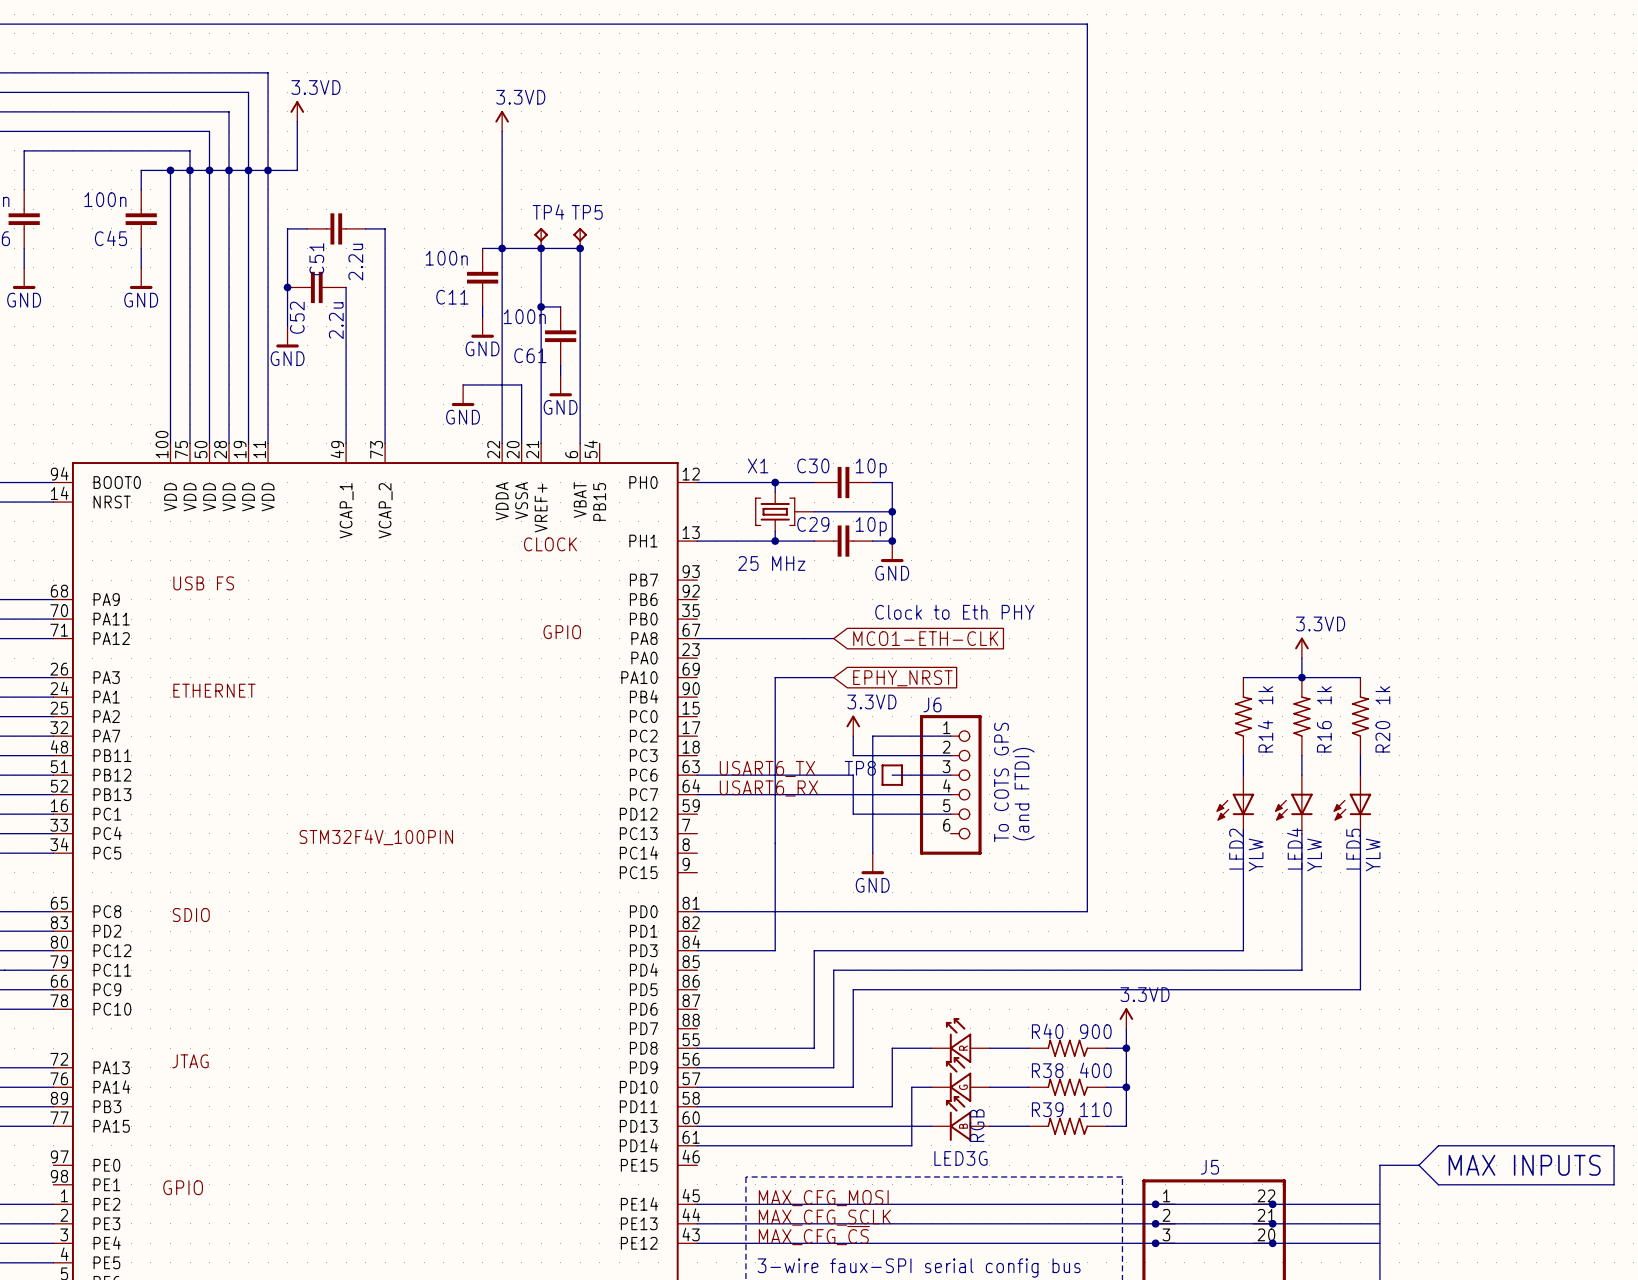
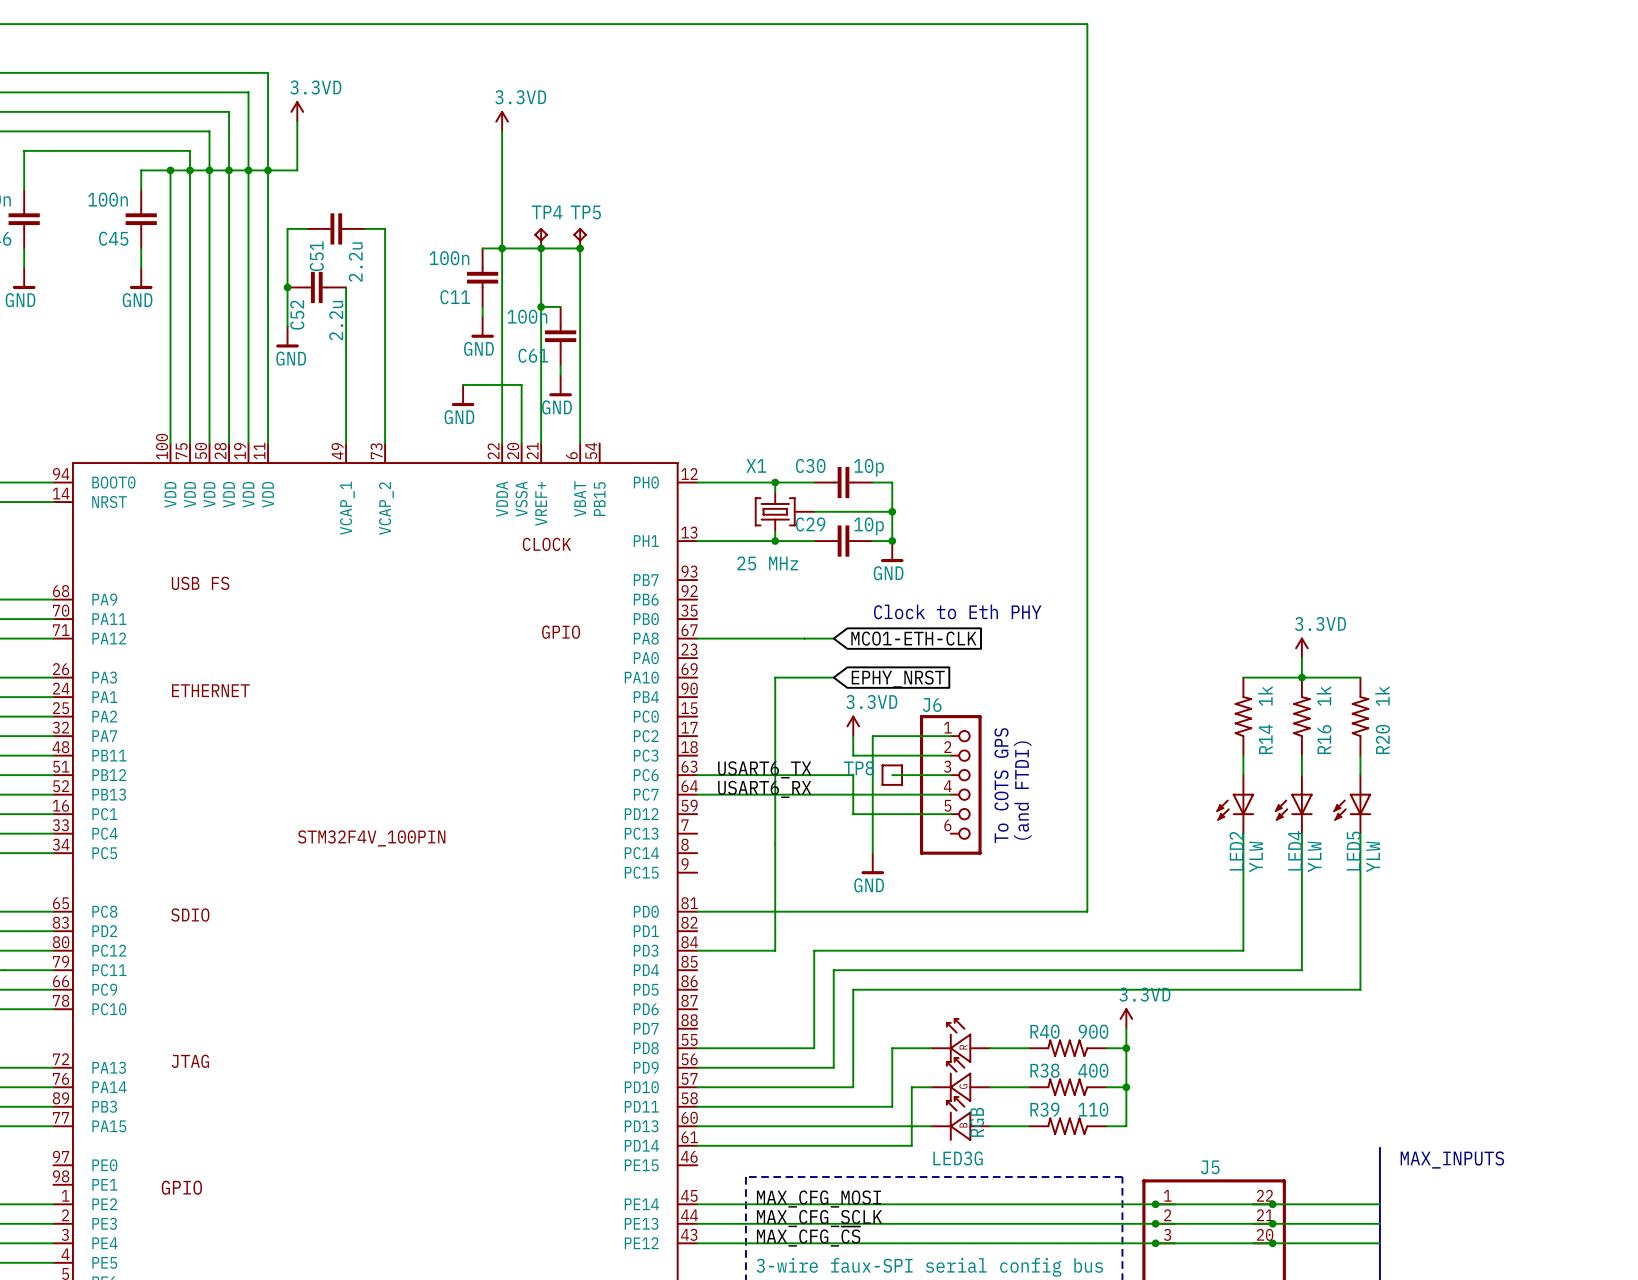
text: none -> MAX_INPUTS (1452, 1160)
bus: (1379, 1165) (1418, 1165) -> (1379, 1165) (1379, 1147)
bus: (1418, 1165) (1438, 1145) (1614, 1145) (1614, 1184) (1438, 1184) (1418, 1165) -> none
text: MAX INPUTS (1524, 1165) -> none

